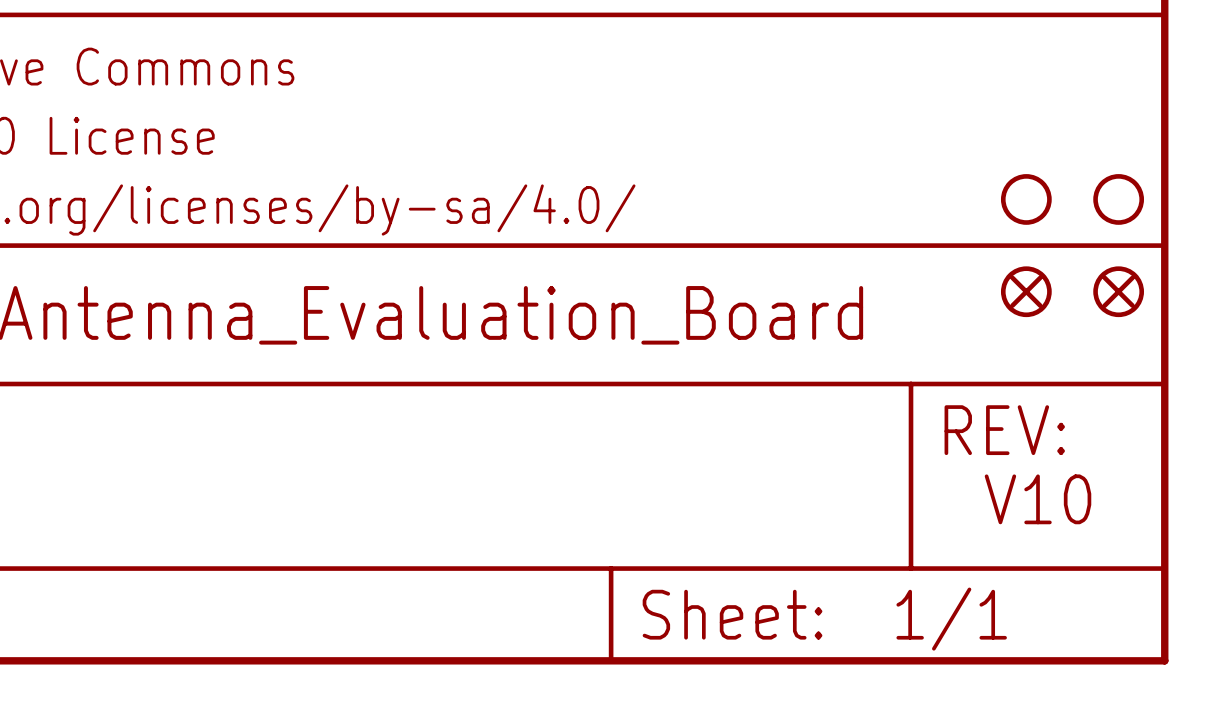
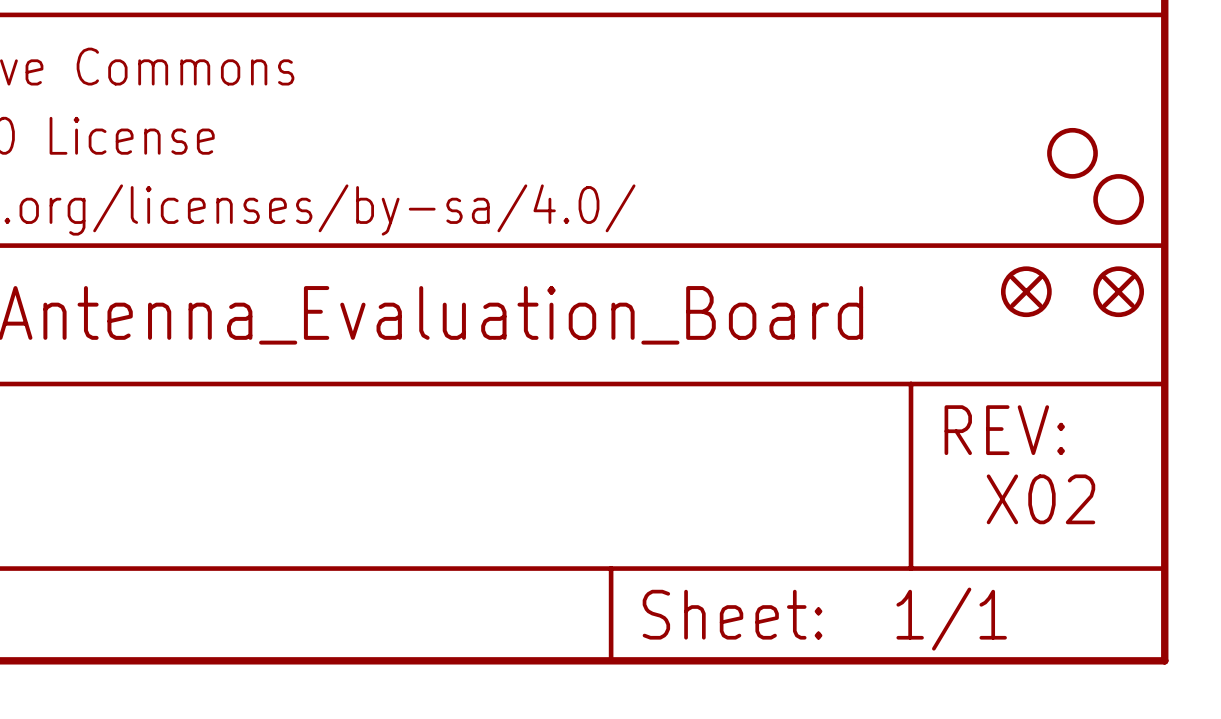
part position: (1026, 199) -> (1072, 153)
text: V10 (1038, 499) -> X02 (1040, 499)

